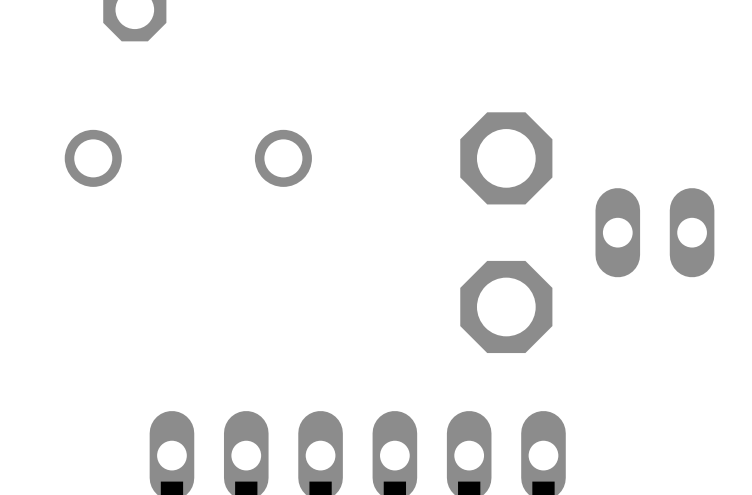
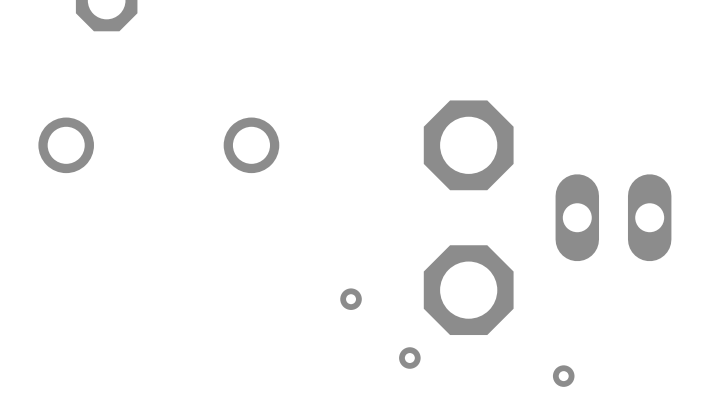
via: none -> (351, 299)
via: none -> (409, 358)
via: none -> (563, 376)

